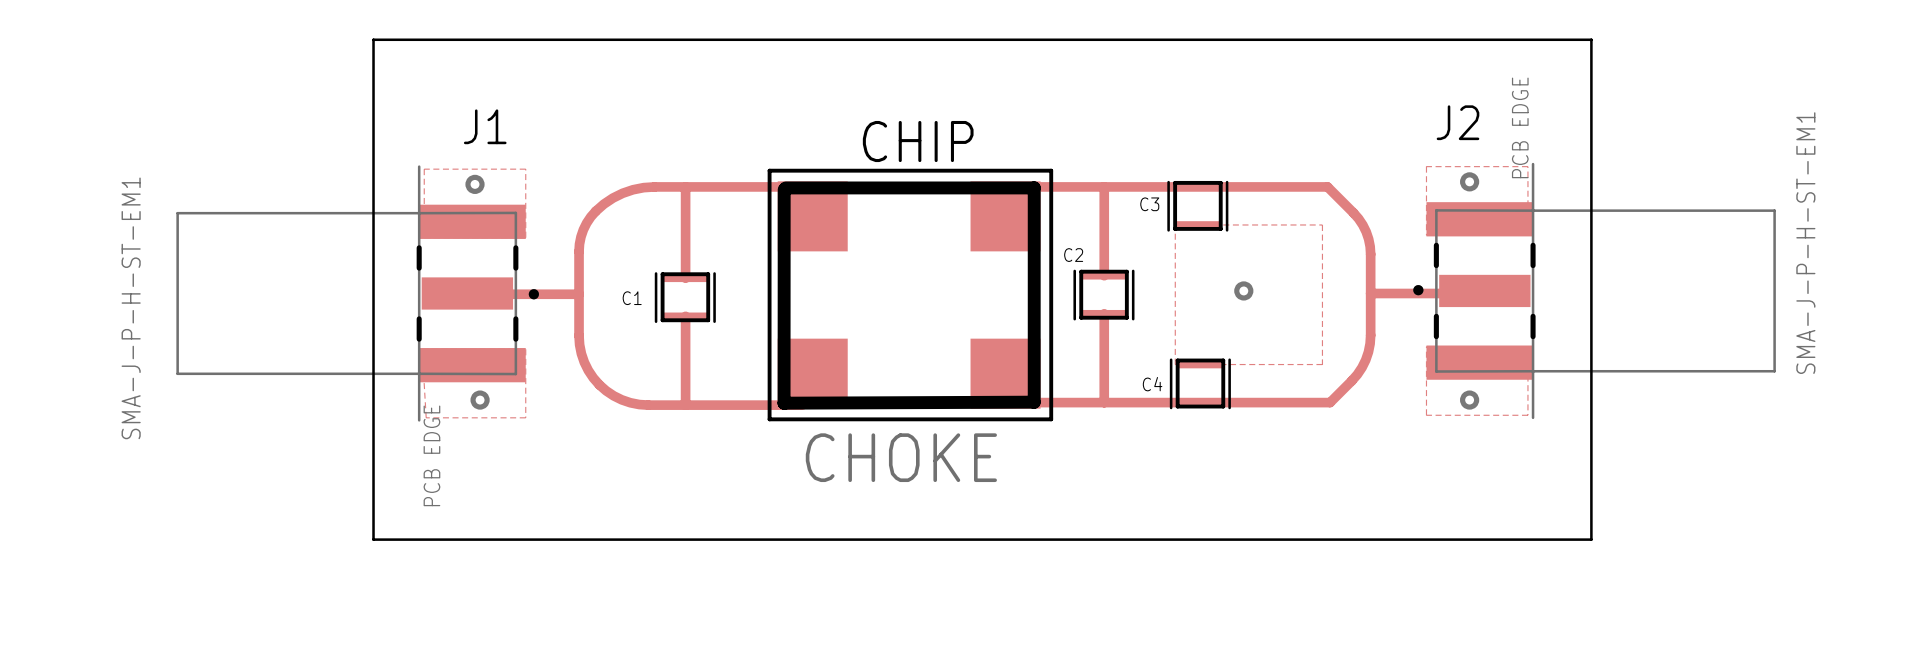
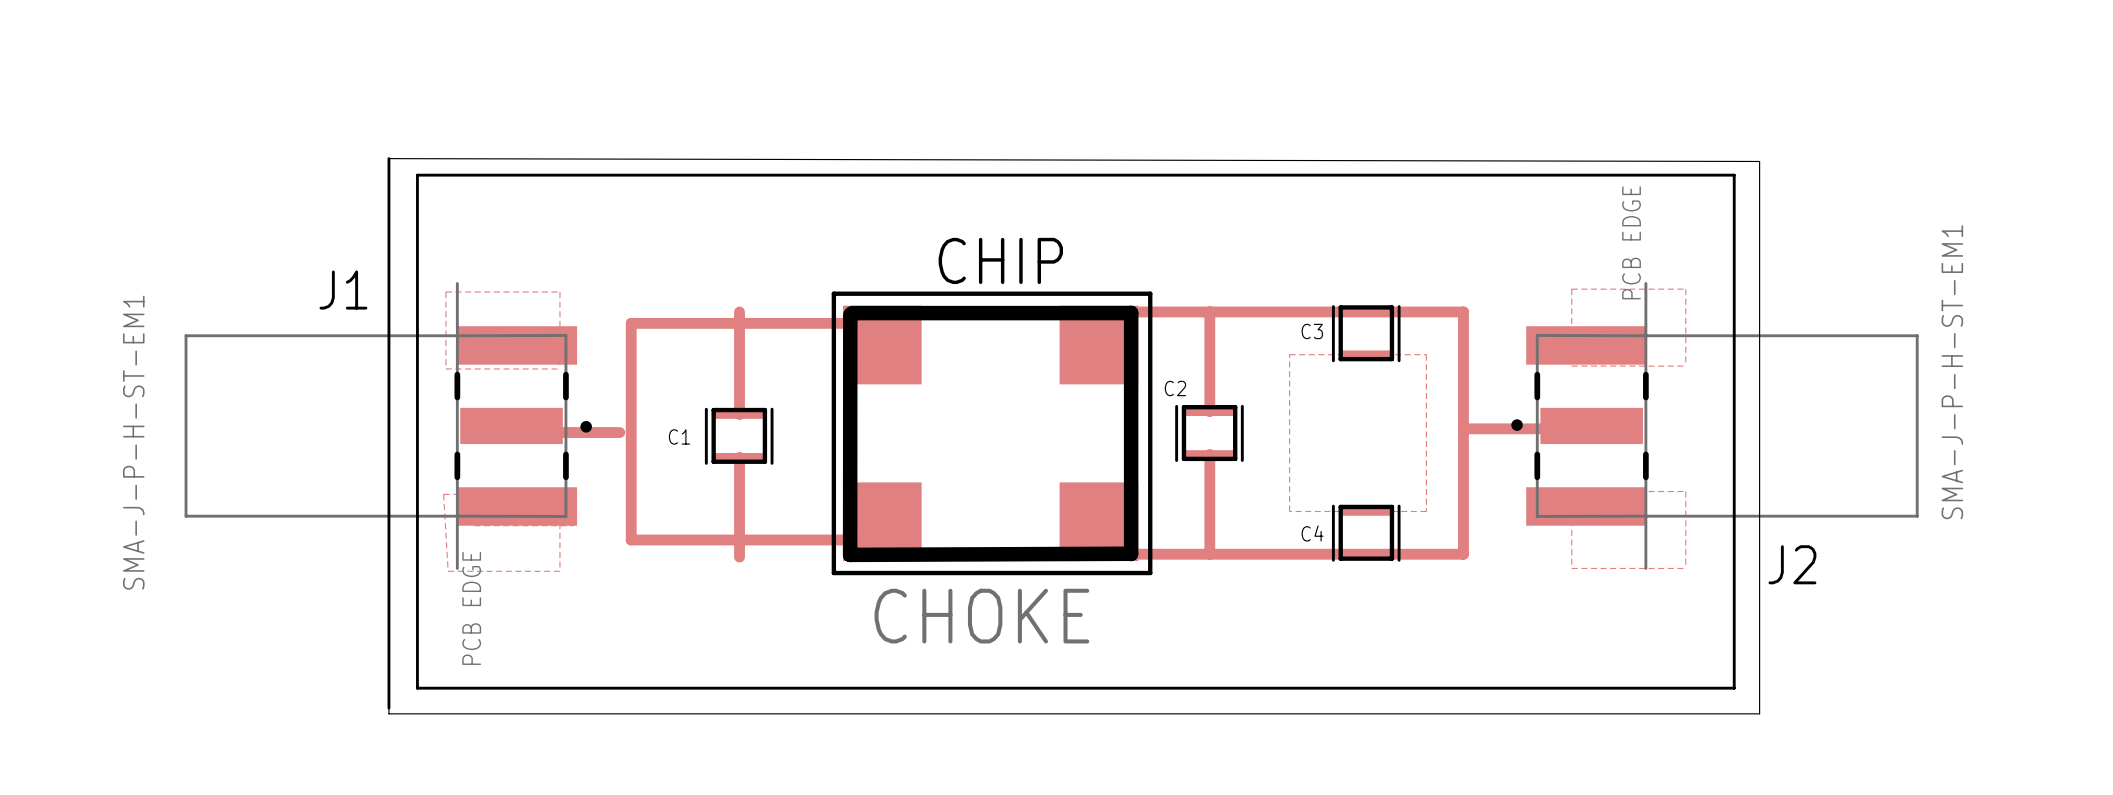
board edge: (373, 50) (373, 39) (1591, 39) (1591, 539) (373, 539) -> (388, 158) (1759, 161) (1759, 713) (388, 713) (388, 708)
board edge: none -> (417, 175) (1734, 175) (1734, 688) (417, 688) (417, 175)
J2 name position: J2 (1458, 122) -> J2 (1792, 564)
J1 name position: J1 (485, 126) -> J1 (343, 290)
via: (1469, 181) -> none
via: (475, 184) -> none
track: (815, 186) (654, 186) (633, 189) (612, 198) (590, 216) (580, 236) (579, 251) (579, 344) (588, 370) (606, 390) (621, 399) (639, 404) (802, 405) -> none
track: (1327, 186) (1362, 225) (1368, 239) (1370, 254) (1370, 335) (1368, 351) (1357, 374) (1330, 402) -> (1460, 311) (1463, 311) (1463, 554)
track: none -> (884, 323) (631, 323) (631, 539) (870, 539)
C3 position: (1197, 206) -> (1366, 333)
zone outline: (1297, 224) (1322, 224) (1322, 364) (1297, 364) -> (1426, 354) (1426, 511)
via: (1243, 290) -> none
J2 position: (1594, 290) -> (1715, 425)
J1 position: (357, 293) -> (388, 425)
track: (1370, 293) (1497, 293) -> (1463, 428) (1605, 428)
C4 position: (1200, 383) -> (1366, 533)
via: (480, 400) -> none
via: (1469, 400) -> none

